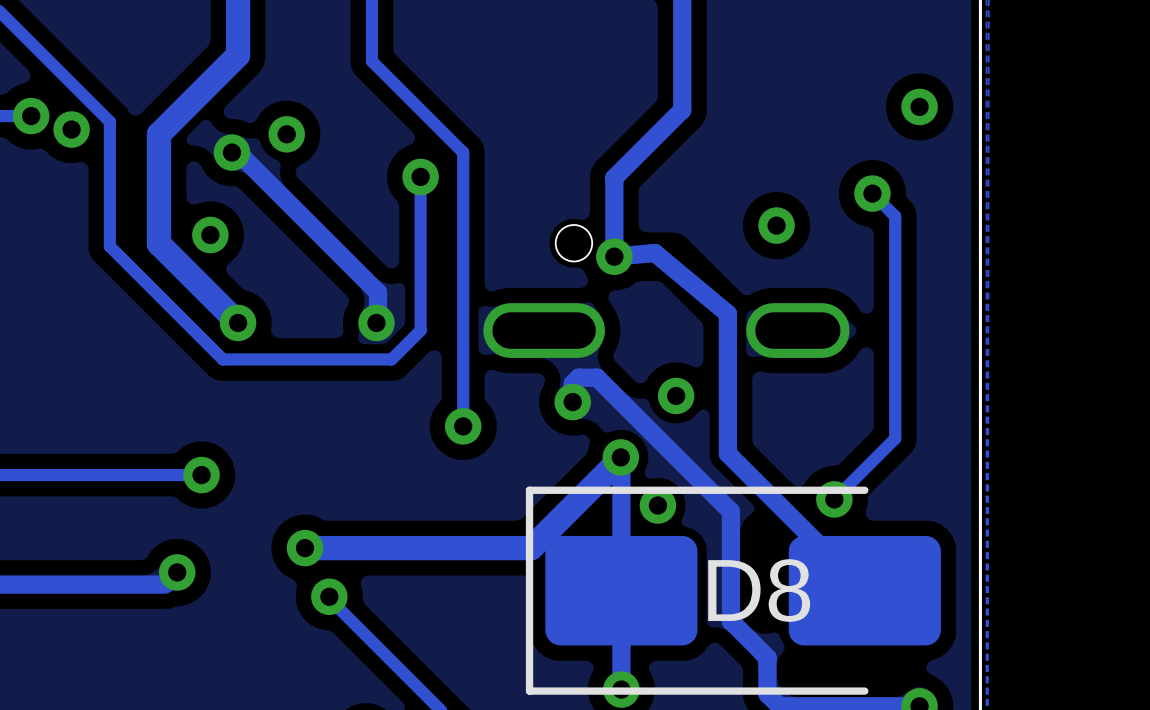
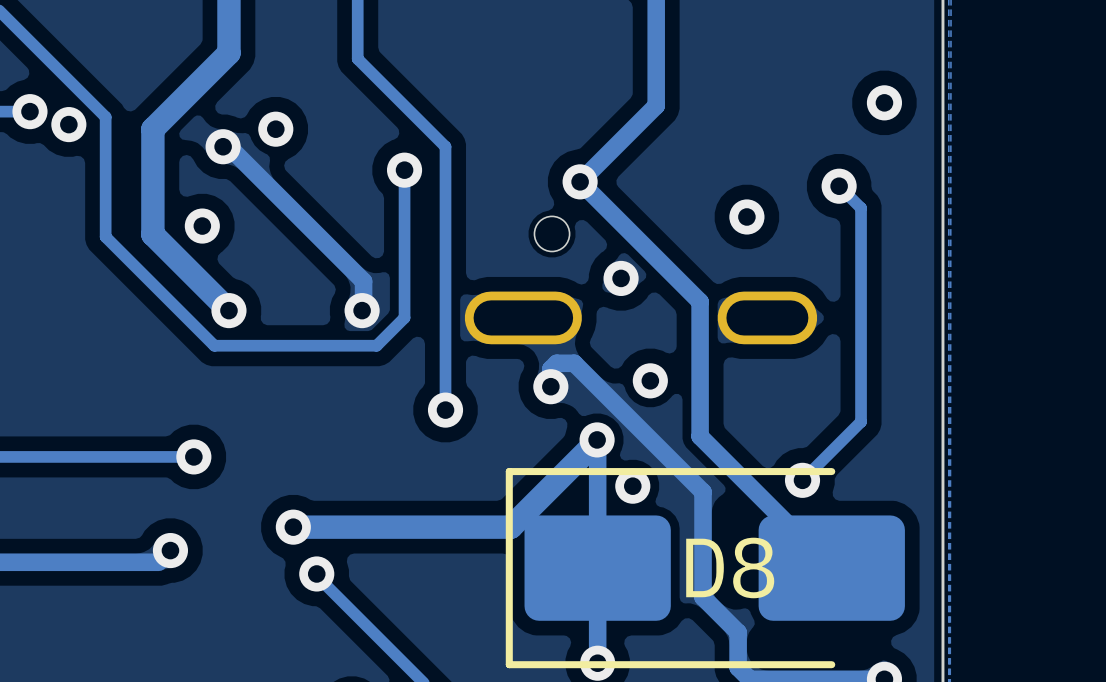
track: (614, 177) (614, 256) (654, 252) (727, 313) -> (590, 171) (580, 181) (700, 301)
via: none -> (580, 181)
via position: (614, 256) -> (621, 278)

